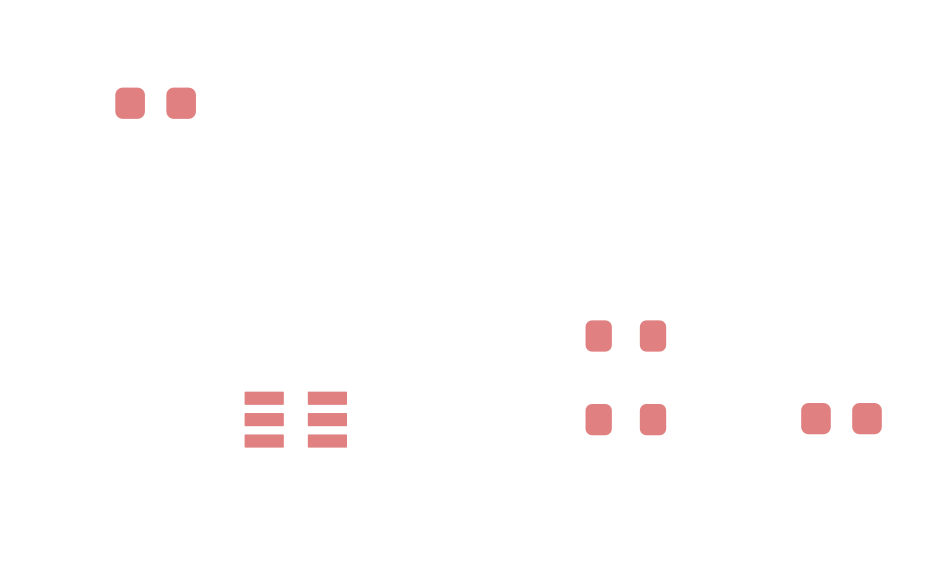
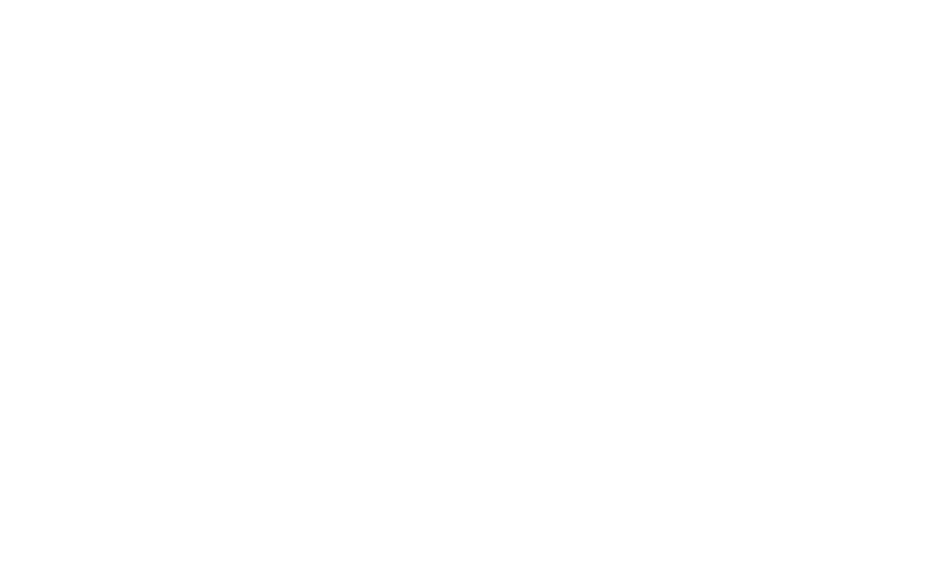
part: (155, 103) -> none
part: (625, 336) -> none
part: (841, 418) -> none
part: (295, 419) -> none
part: (625, 419) -> none

